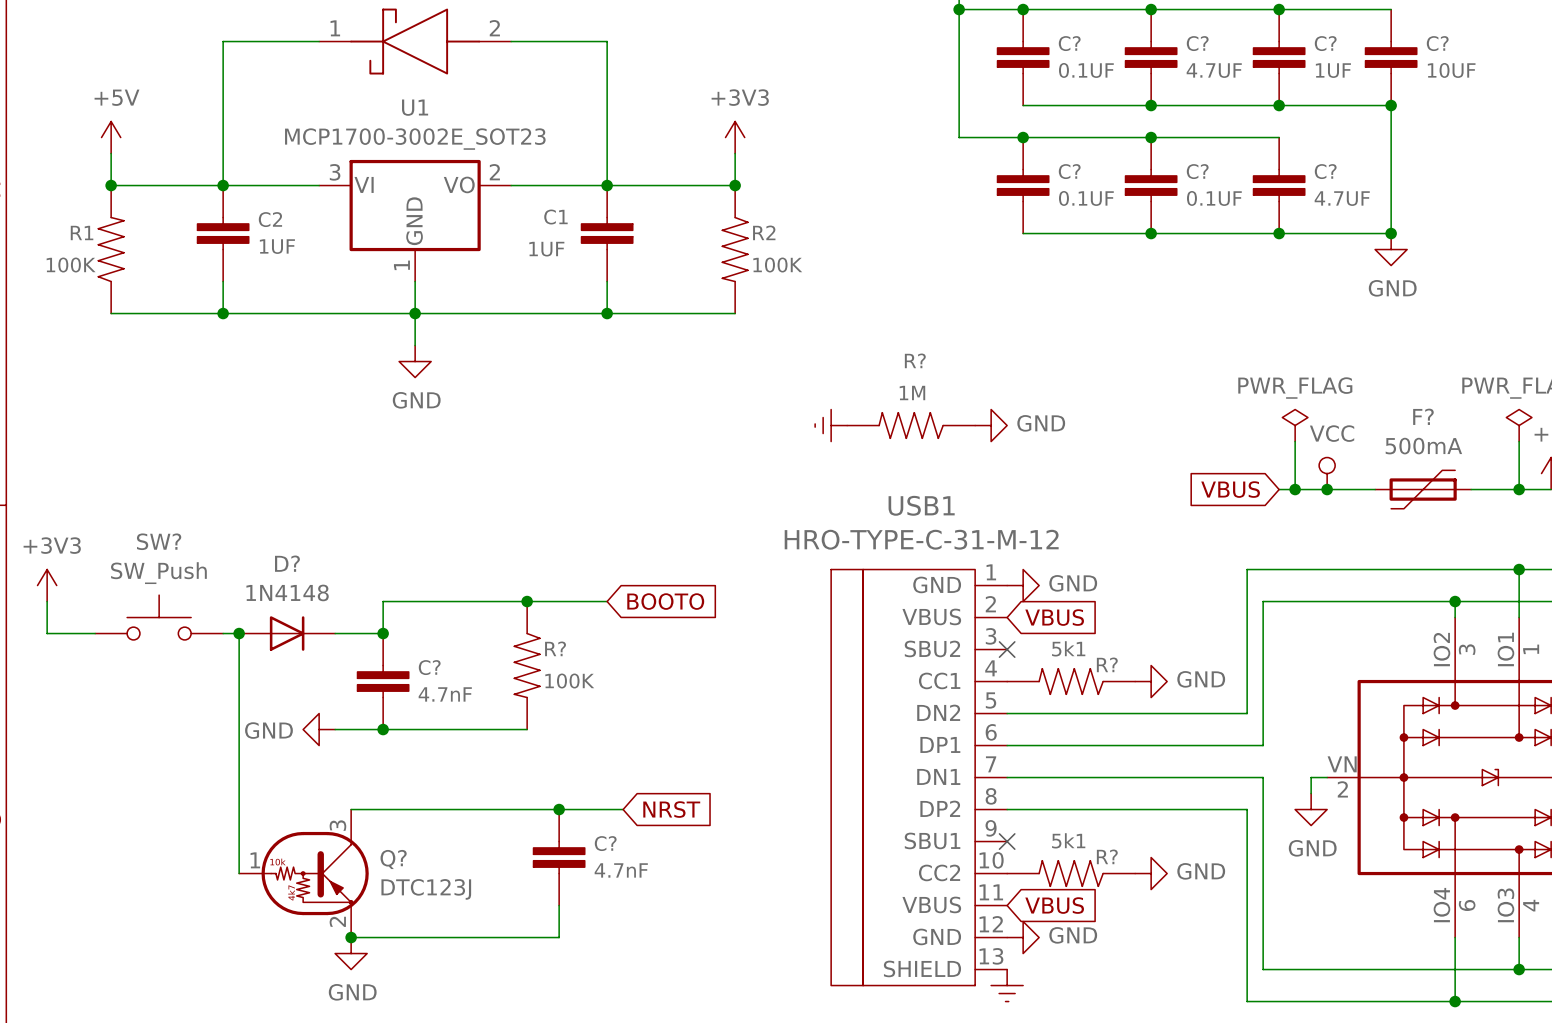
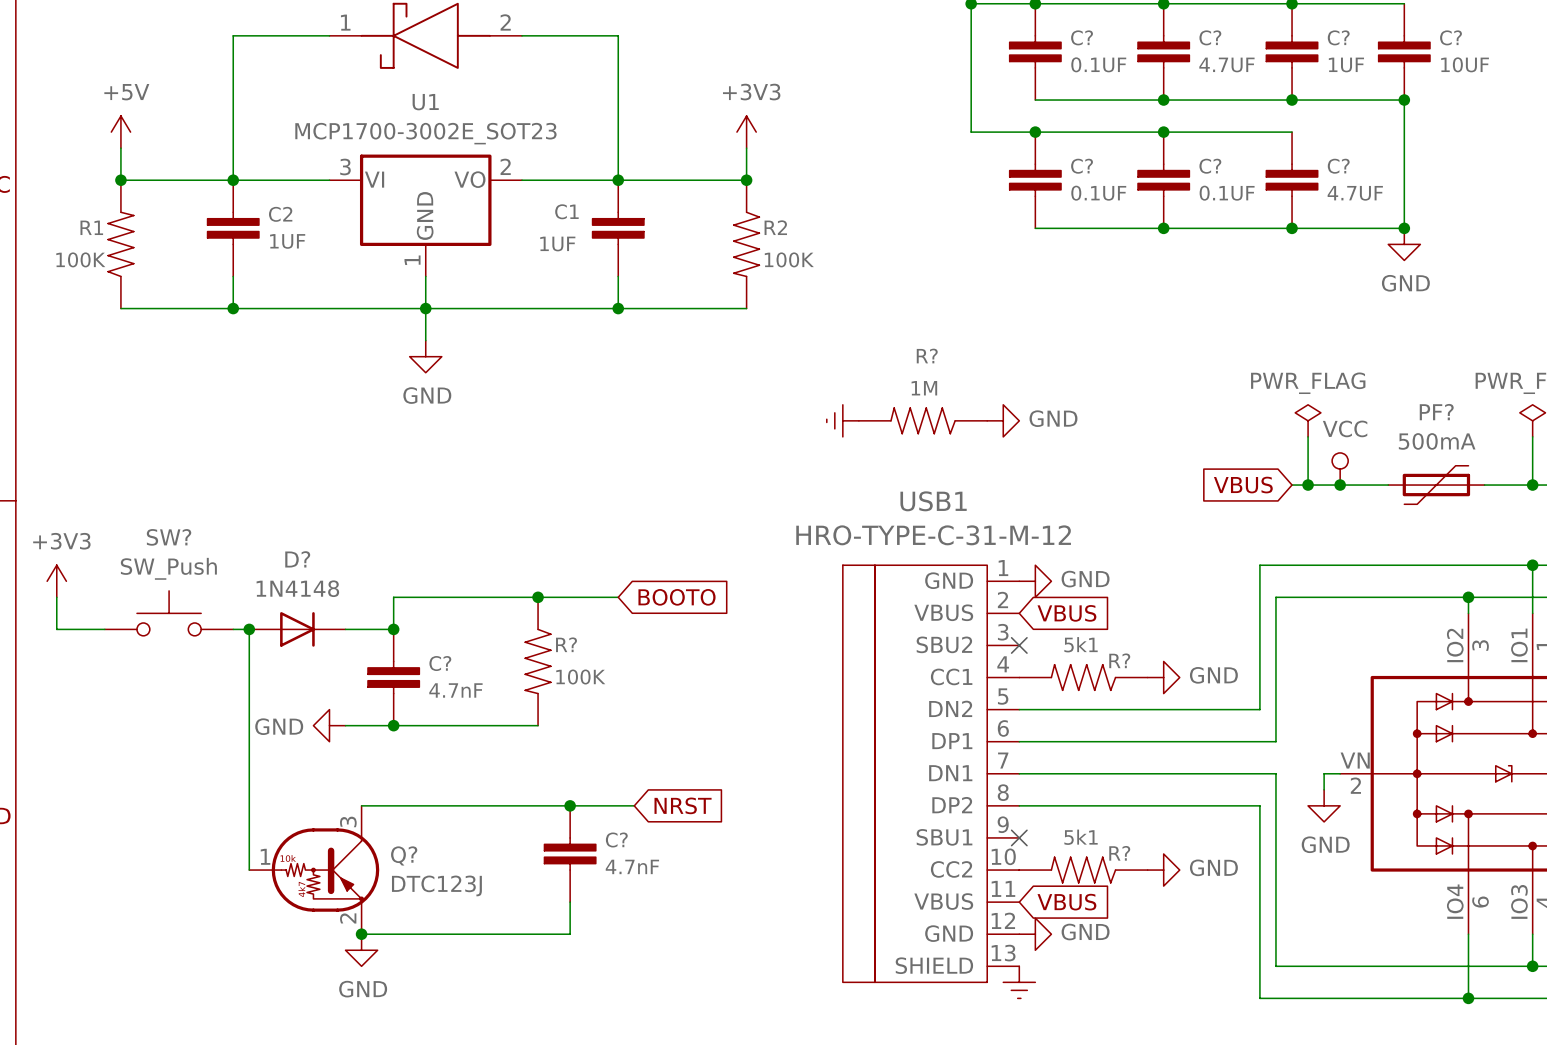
F? name: F? (1423, 416) -> PF? (1436, 412)

